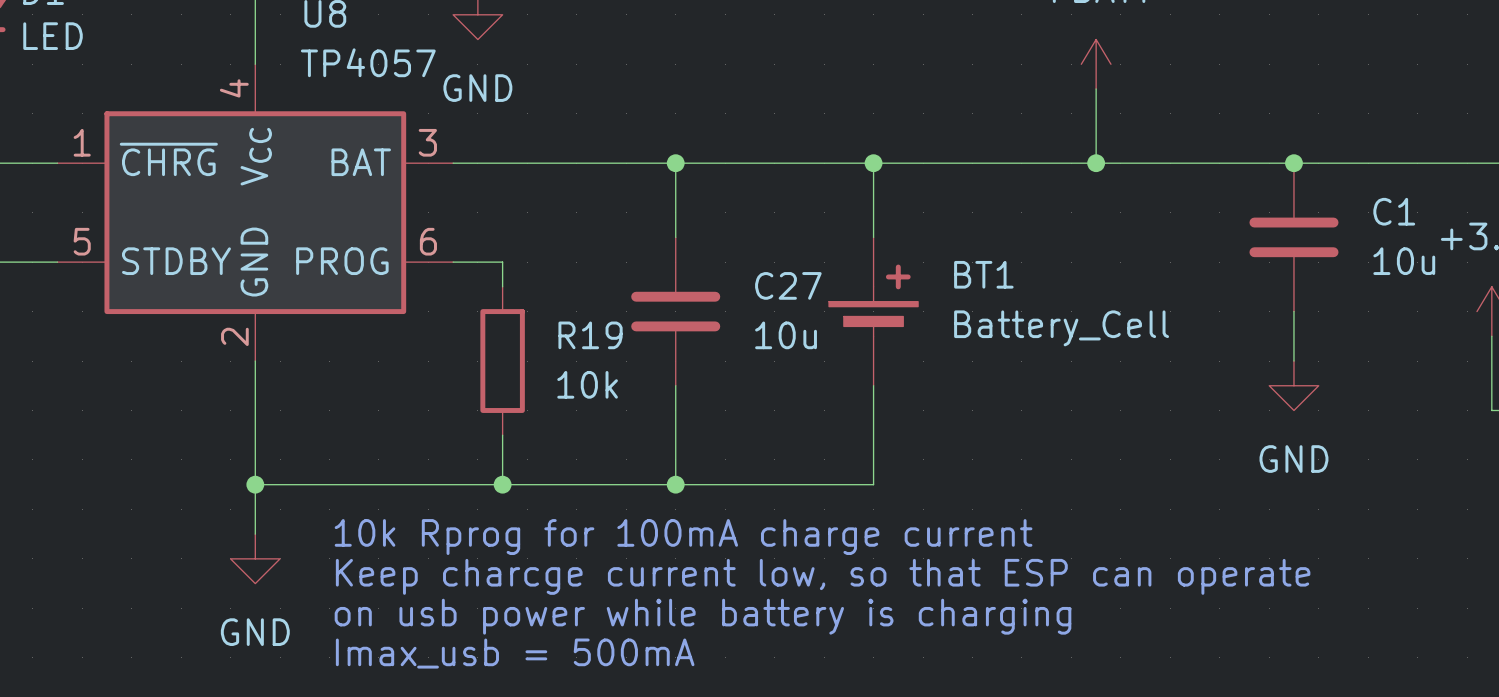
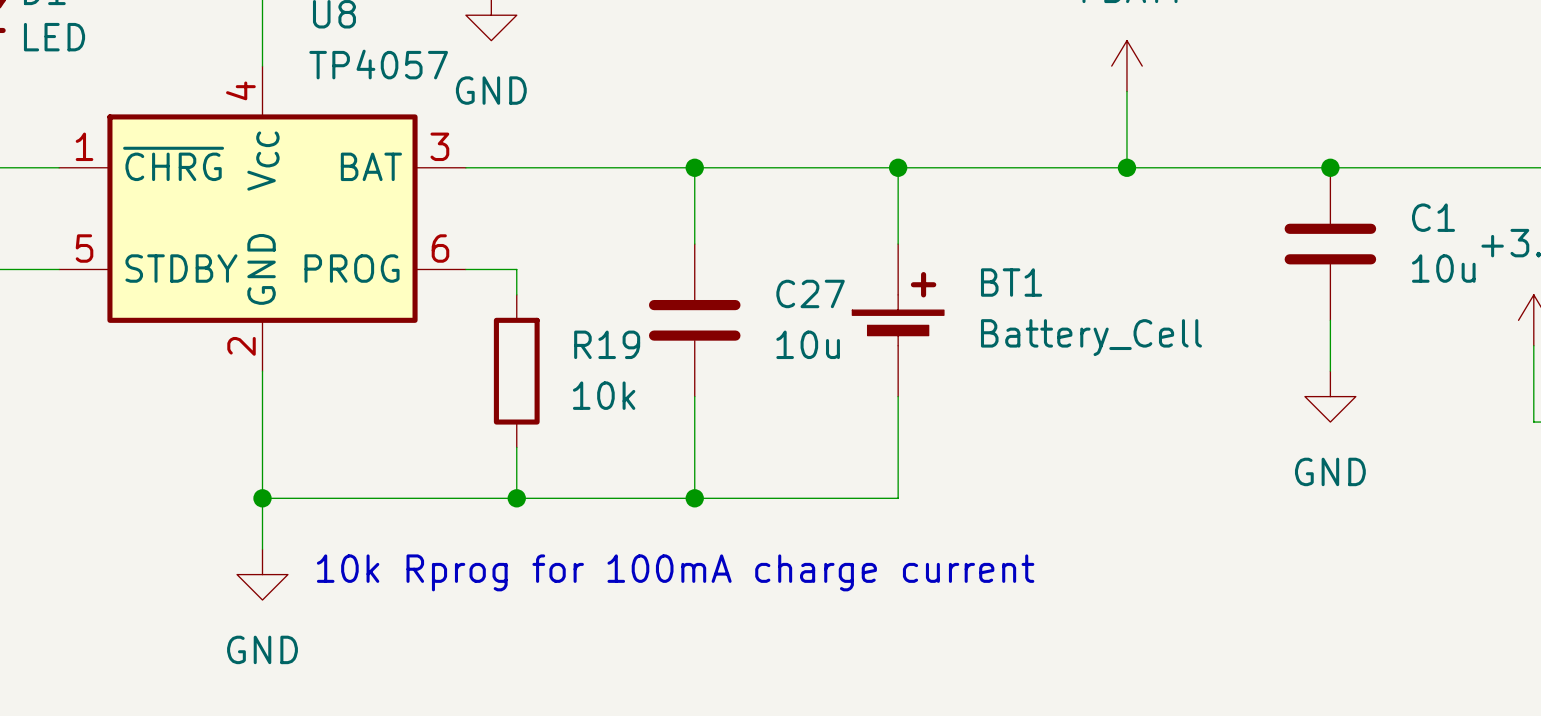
text position: 10k Rprog for 100mA charge current (683, 537) -> 10k Rprog for 100mA charge current (675, 572)
text: Keep charcge current low, so that ESP can operate (823, 576) -> none
text: on usb power while battery is charging (702, 616) -> none
text: Imax_usb = 500mA (515, 653) -> none

